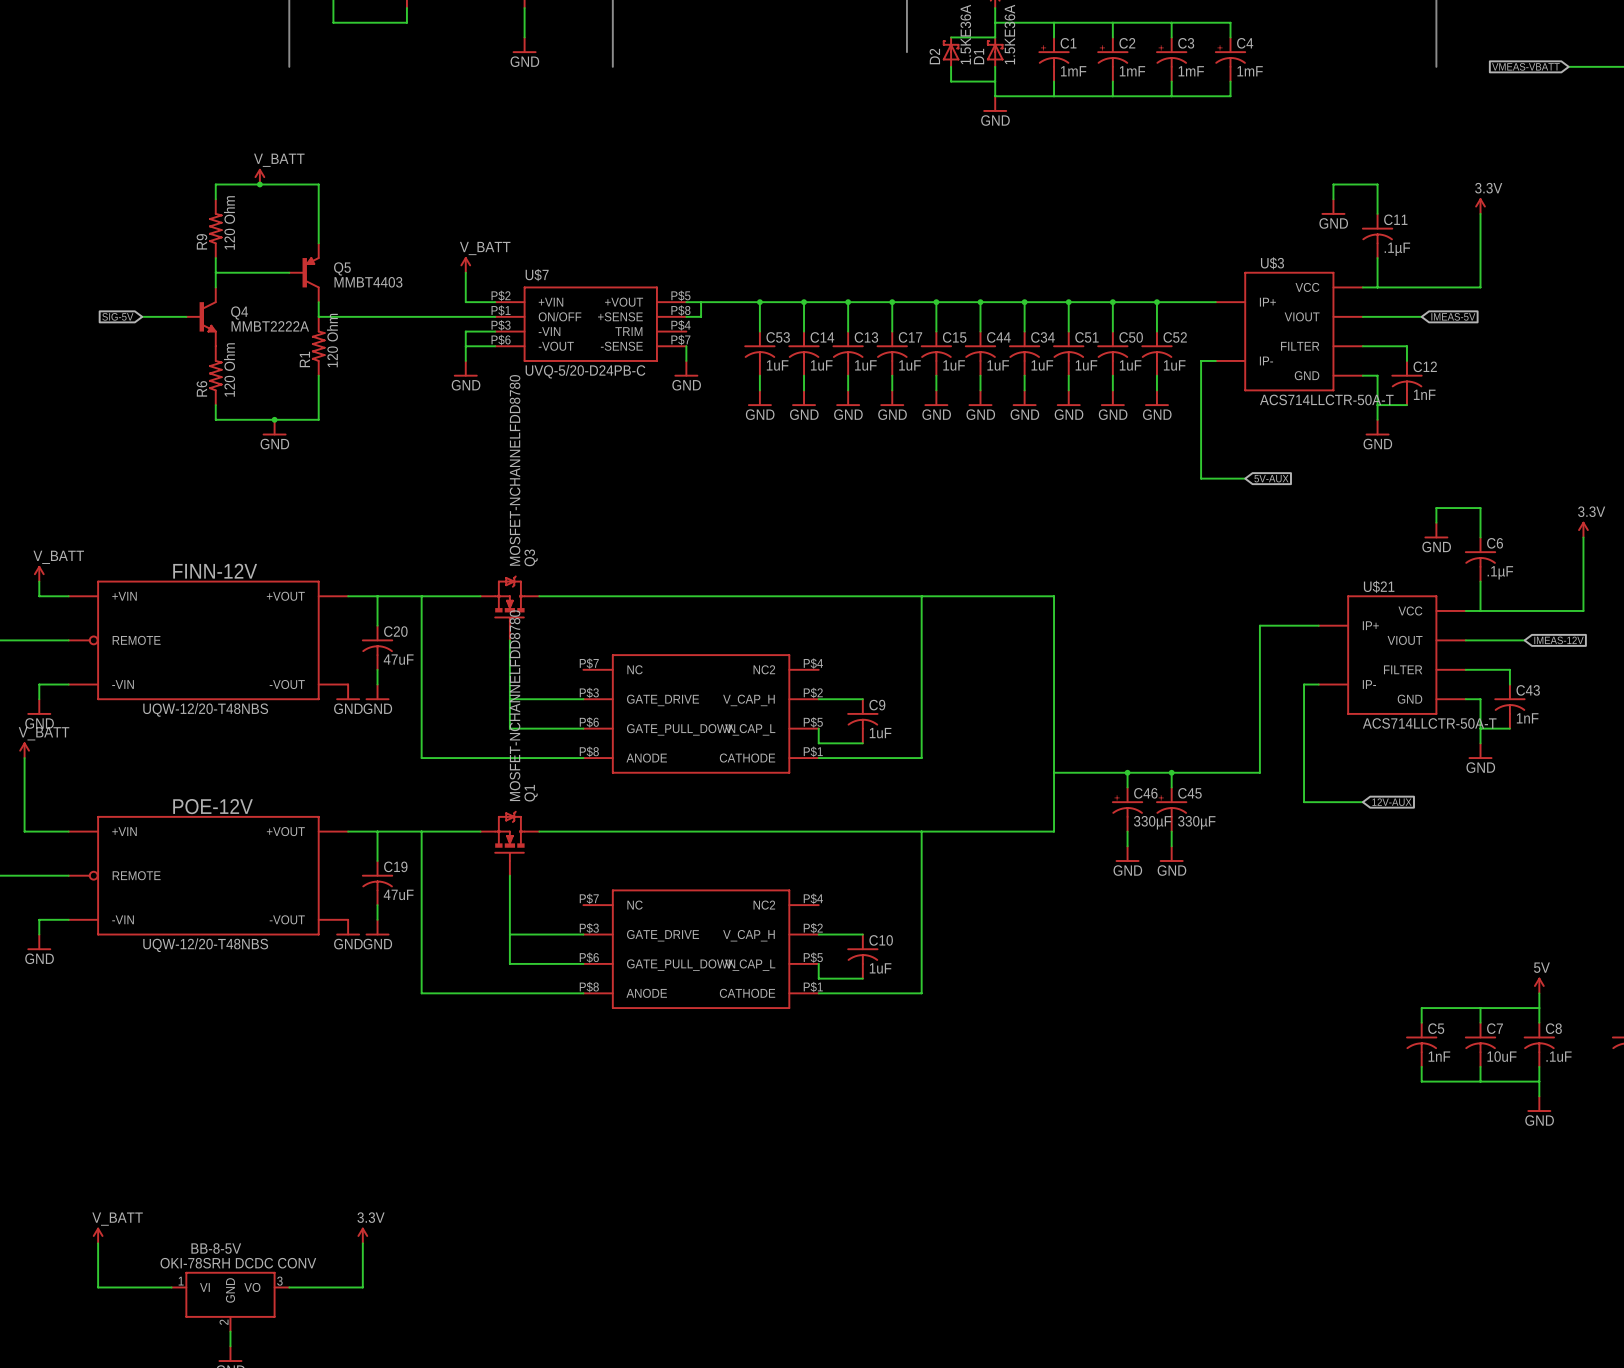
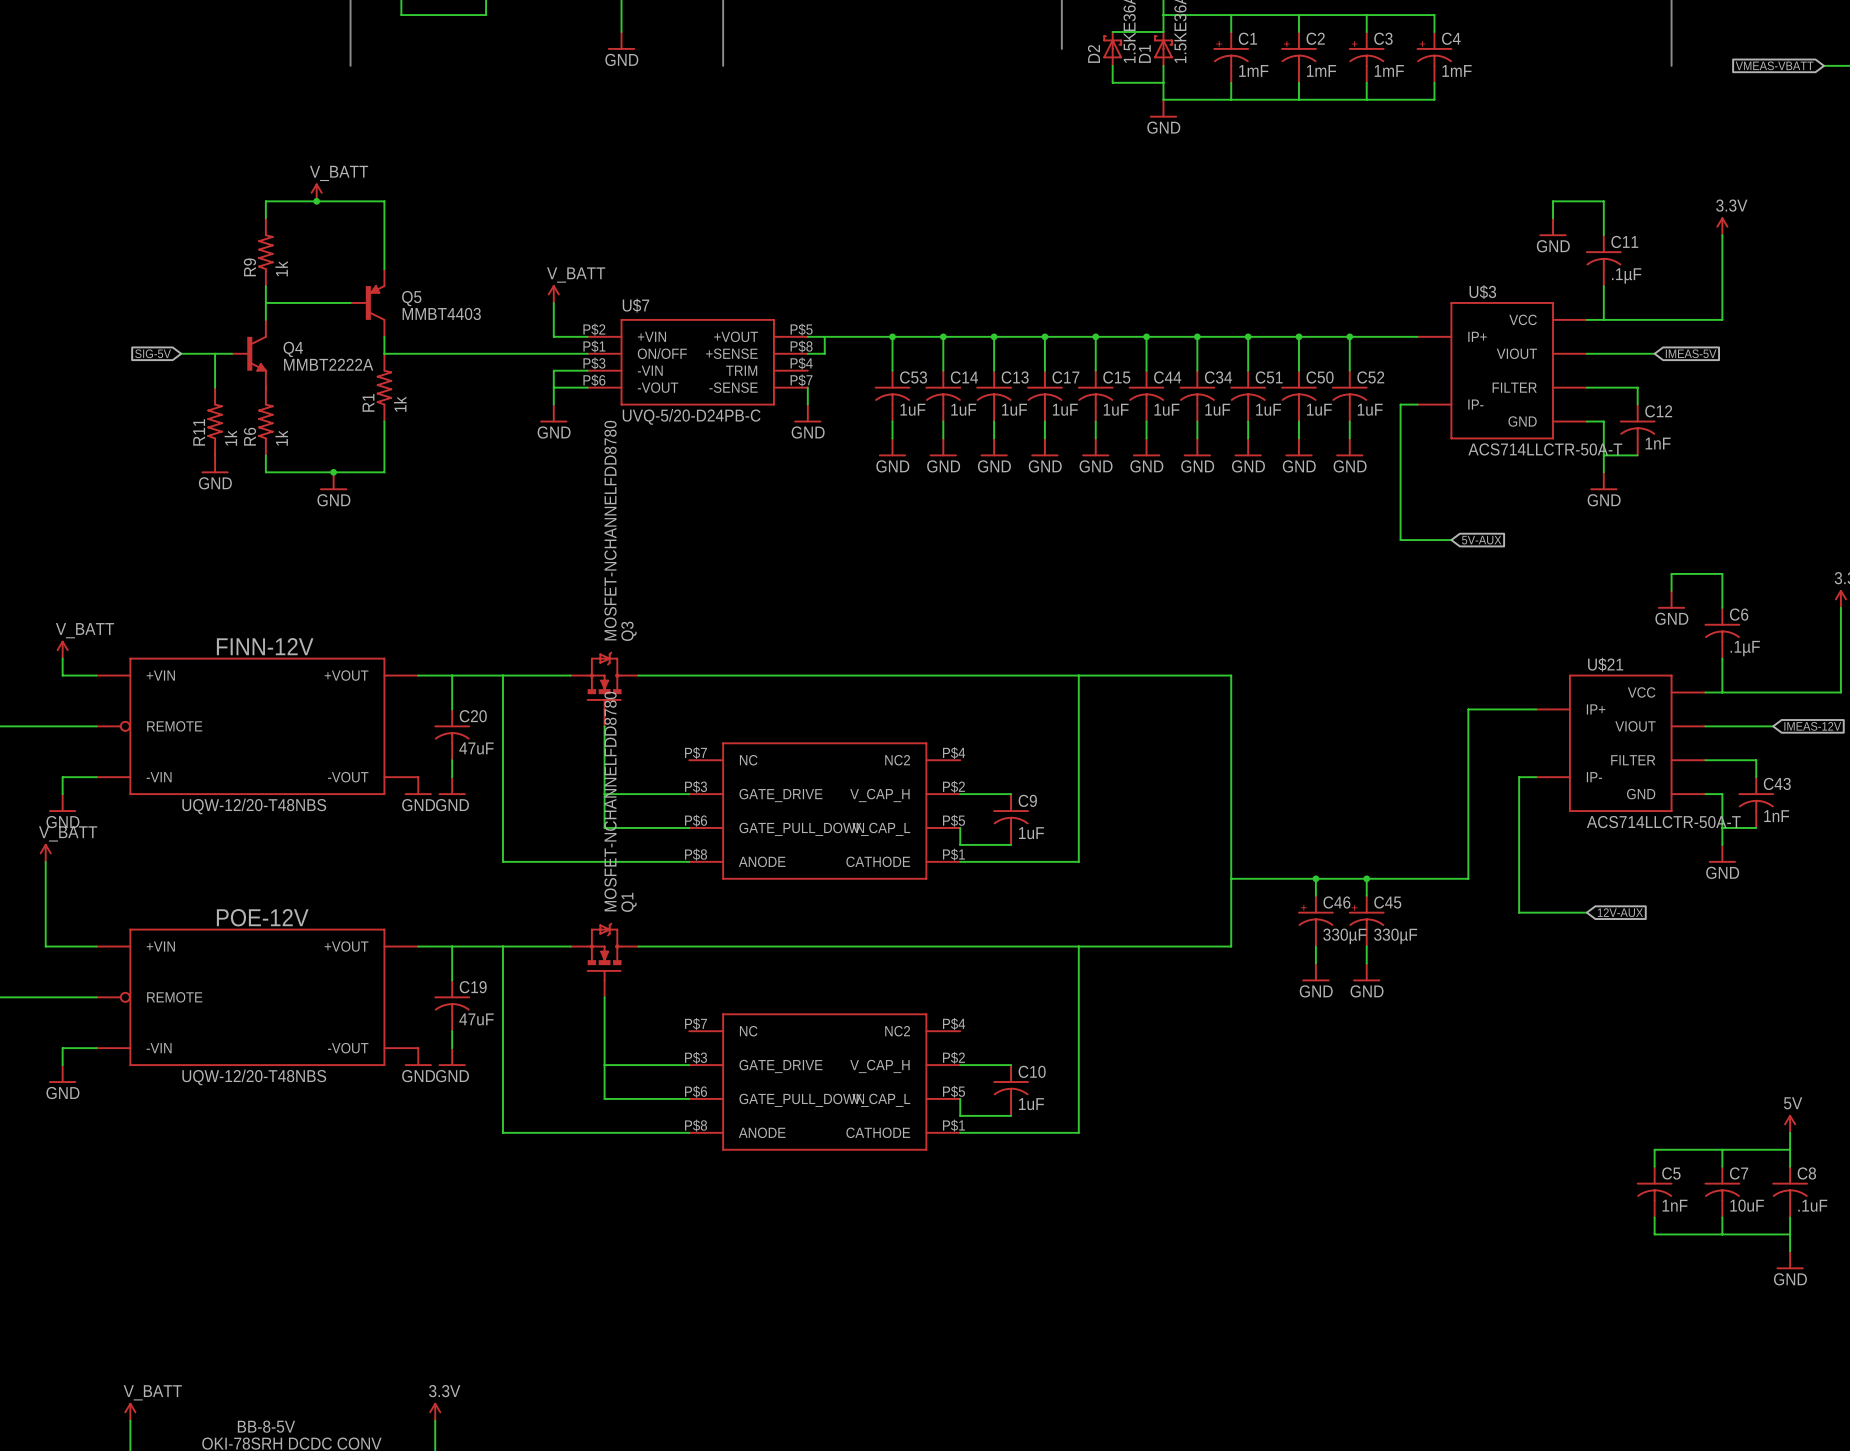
R9 value: 120 Ohm (229, 222) -> 1k (281, 268)
wire: none -> (215, 353) (215, 387)
R1 value: 120 Ohm (332, 340) -> 1k (400, 404)
R6 value: 120 Ohm (229, 369) -> 1k (281, 438)
R11: none -> 1k (215, 421)
power symbol: none -> GND (215, 464)

